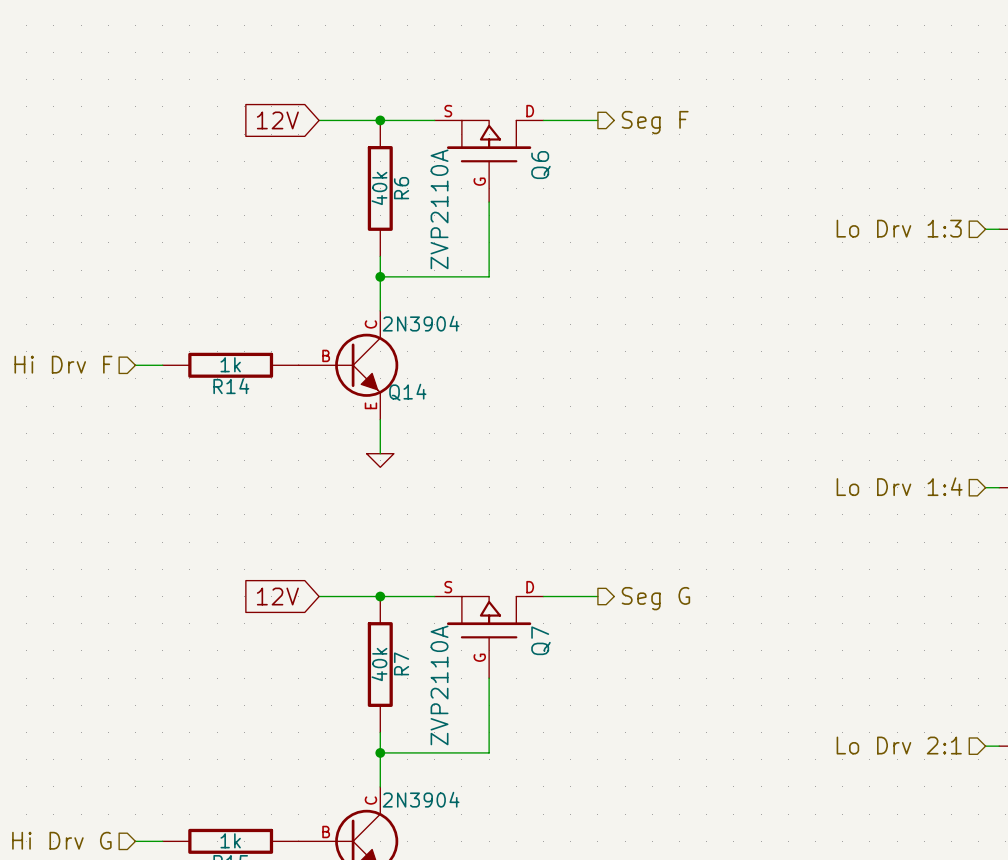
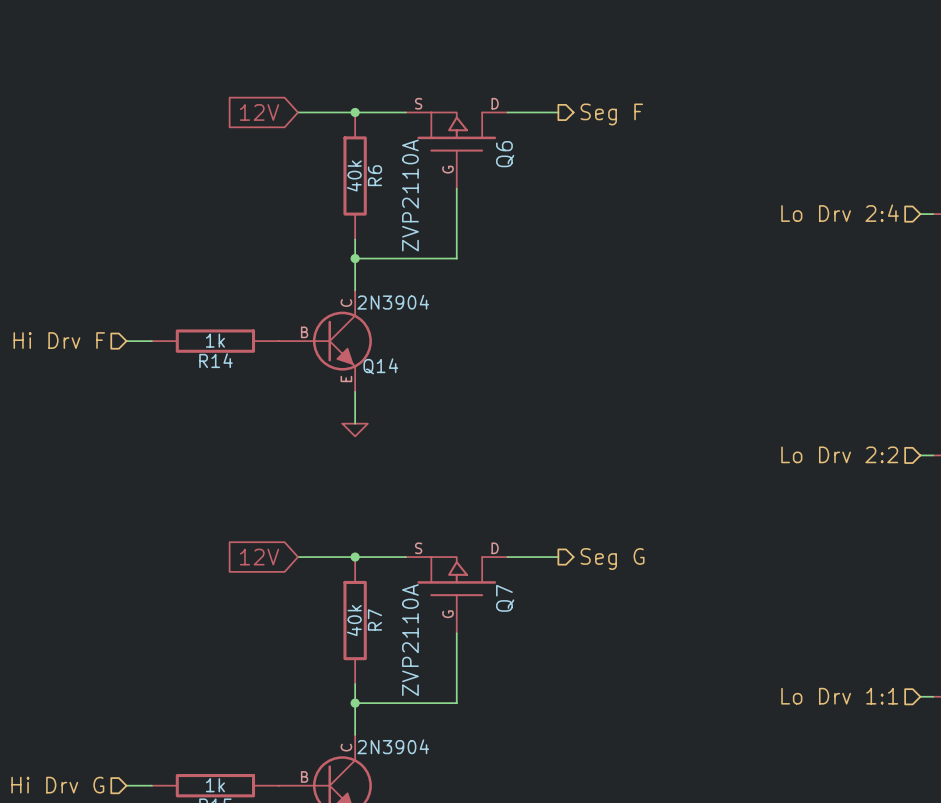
hierarchical label: Lo Drv 1:3 (899, 228) -> Lo Drv 2:4 (840, 213)
hierarchical label: Lo Drv 1:4 (899, 486) -> Lo Drv 2:2 (839, 454)
hierarchical label: Lo Drv 2:1 (899, 745) -> Lo Drv 1:1 (839, 696)

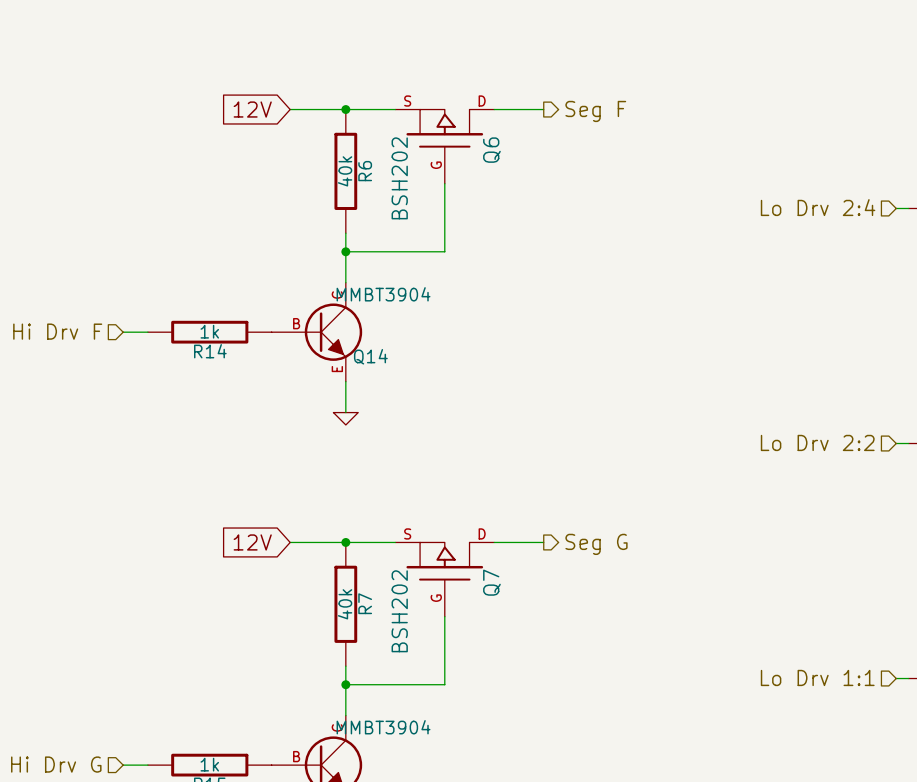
Q6 value: ZVP2110A (410, 195) -> BSH202 (399, 178)
Q14 value: 2N3904 (393, 302) -> MMBT3904 (383, 294)
Q7 value: ZVP2110A (410, 640) -> BSH202 (399, 611)
part value: 2N3904 (393, 746) -> MMBT3904 (383, 727)

